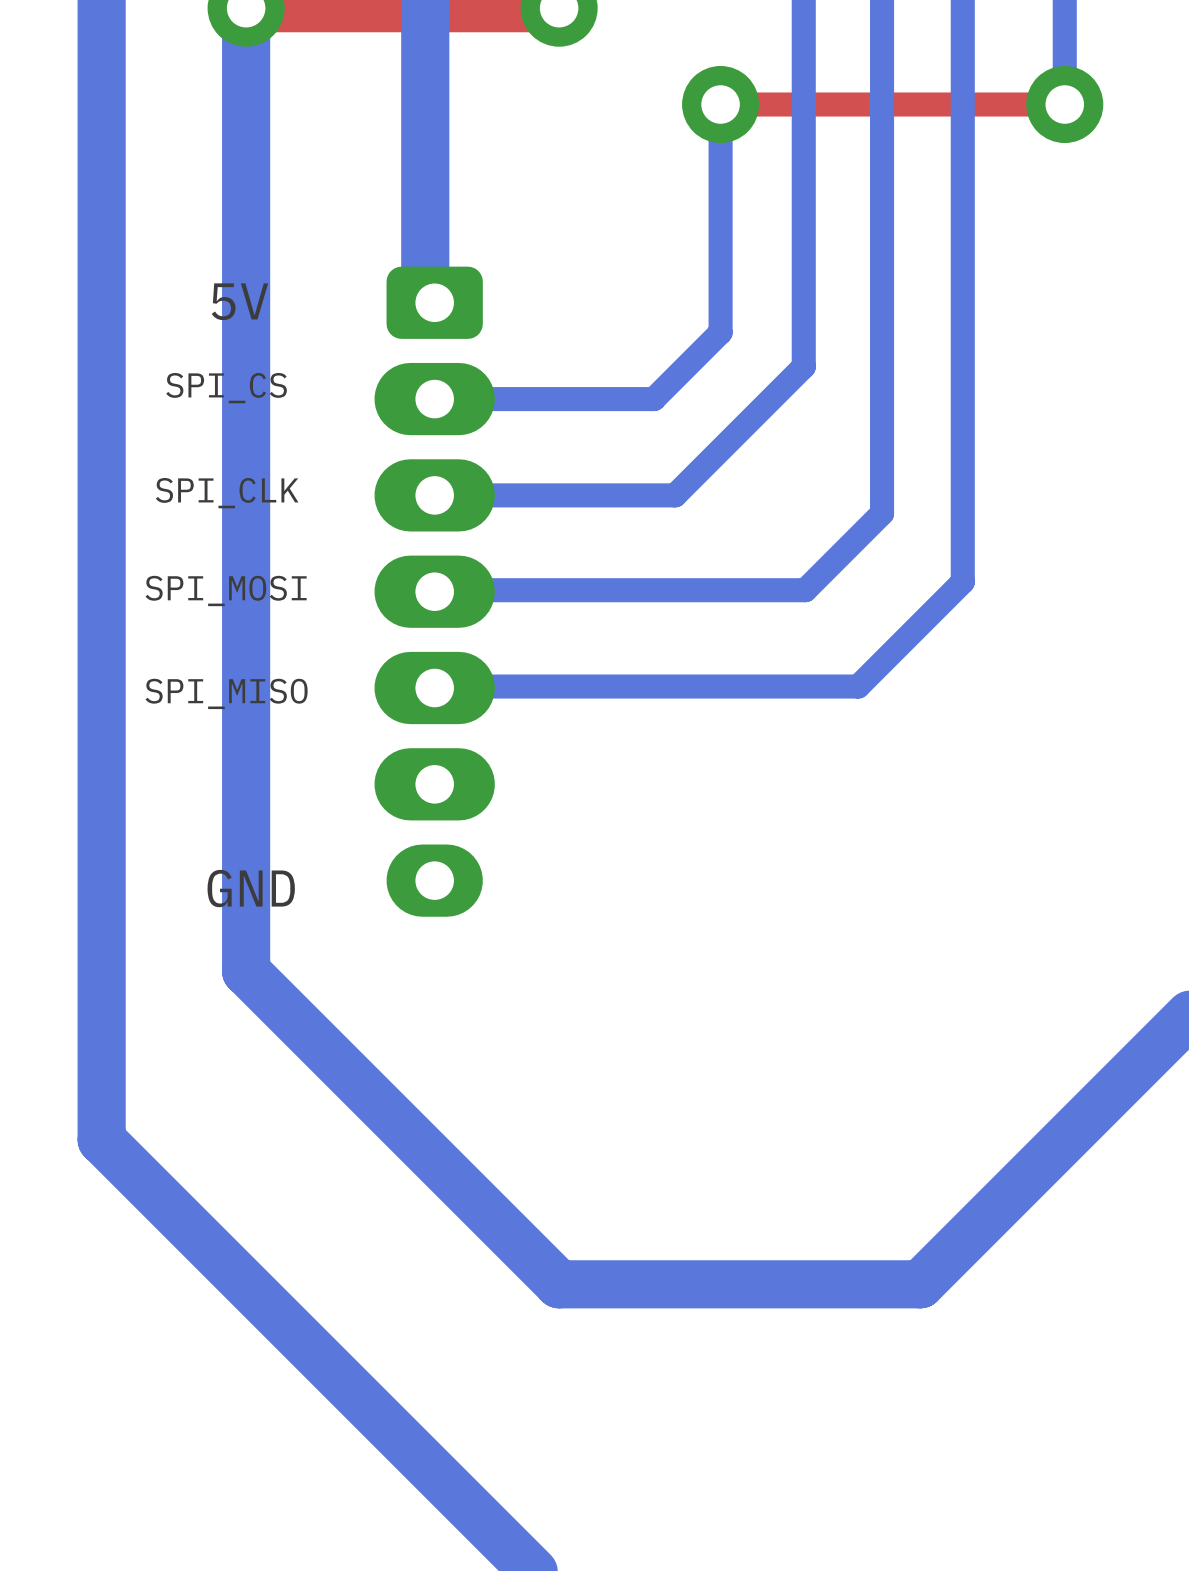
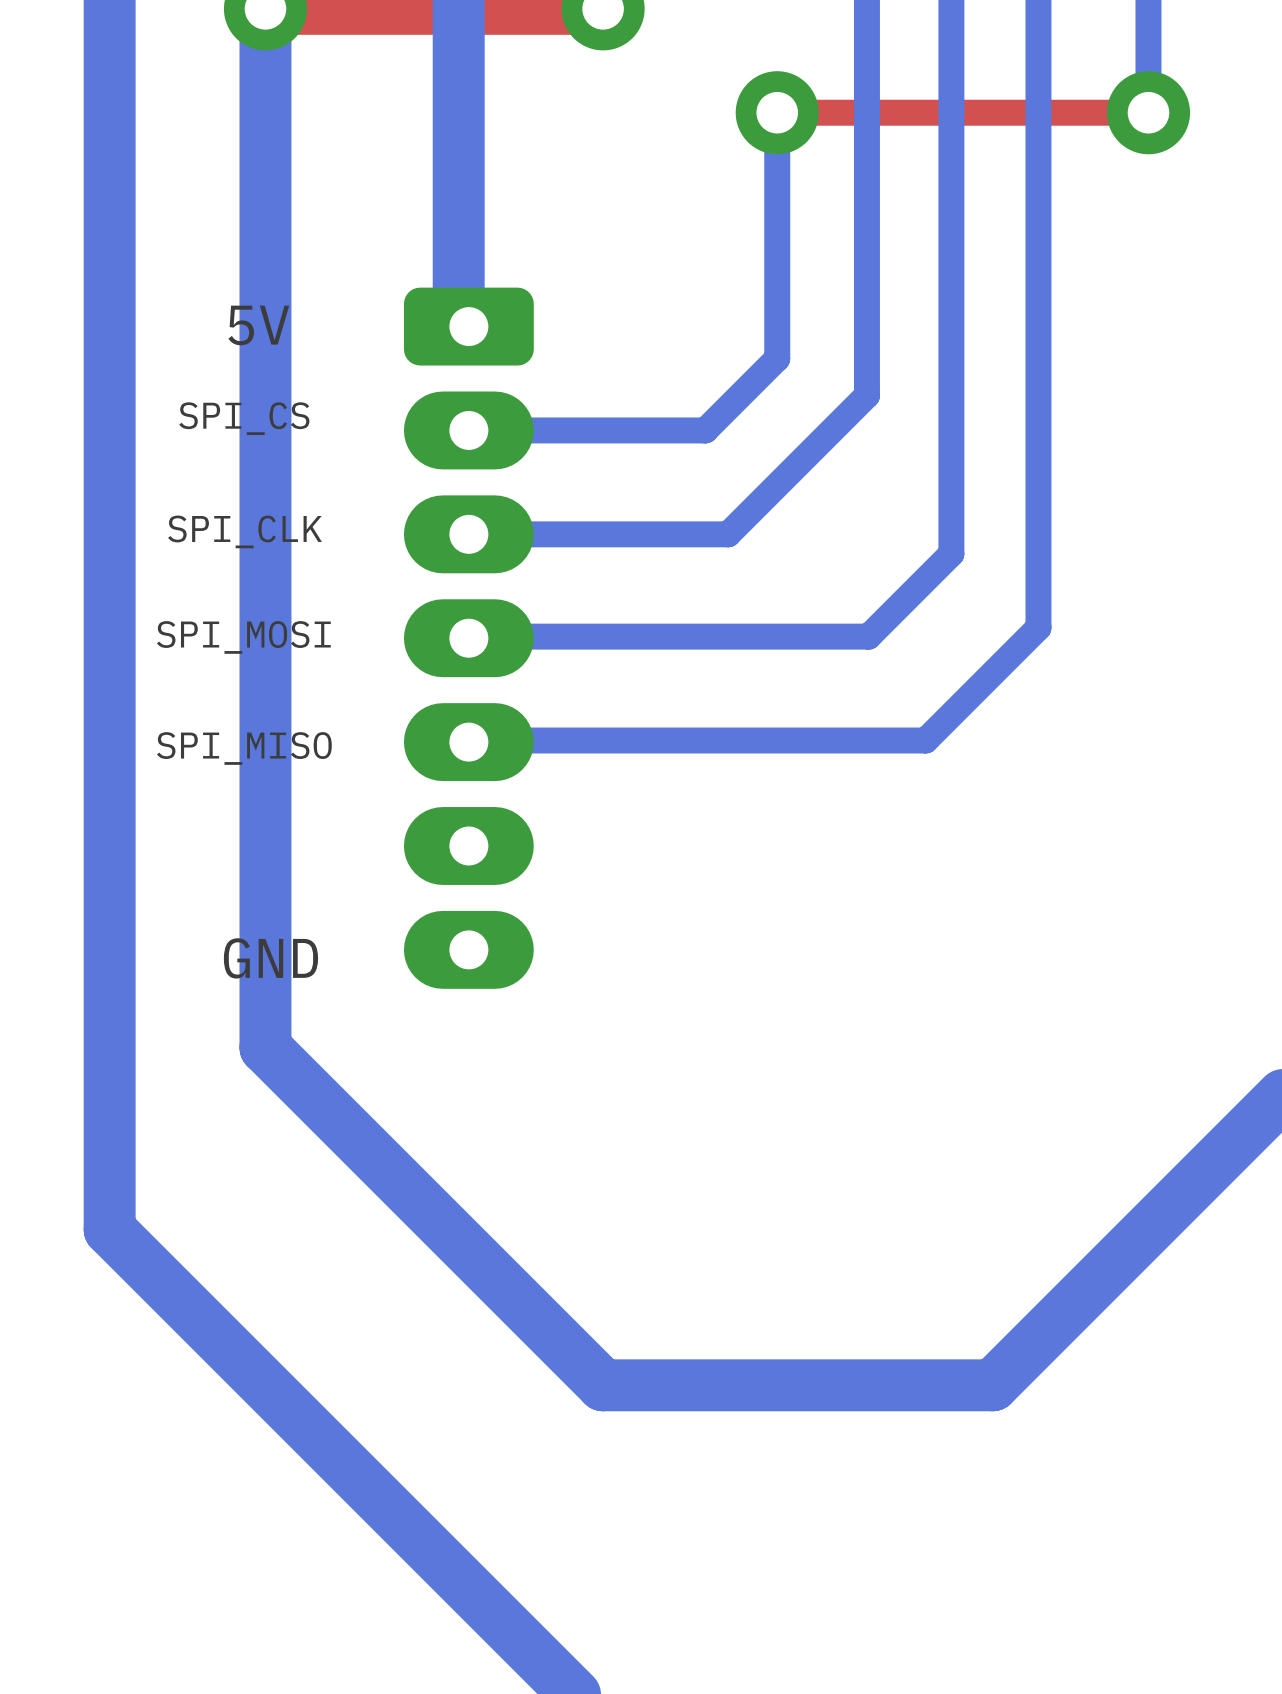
part footprint: [374, 266, 495, 917] -> [403, 287, 534, 989]

